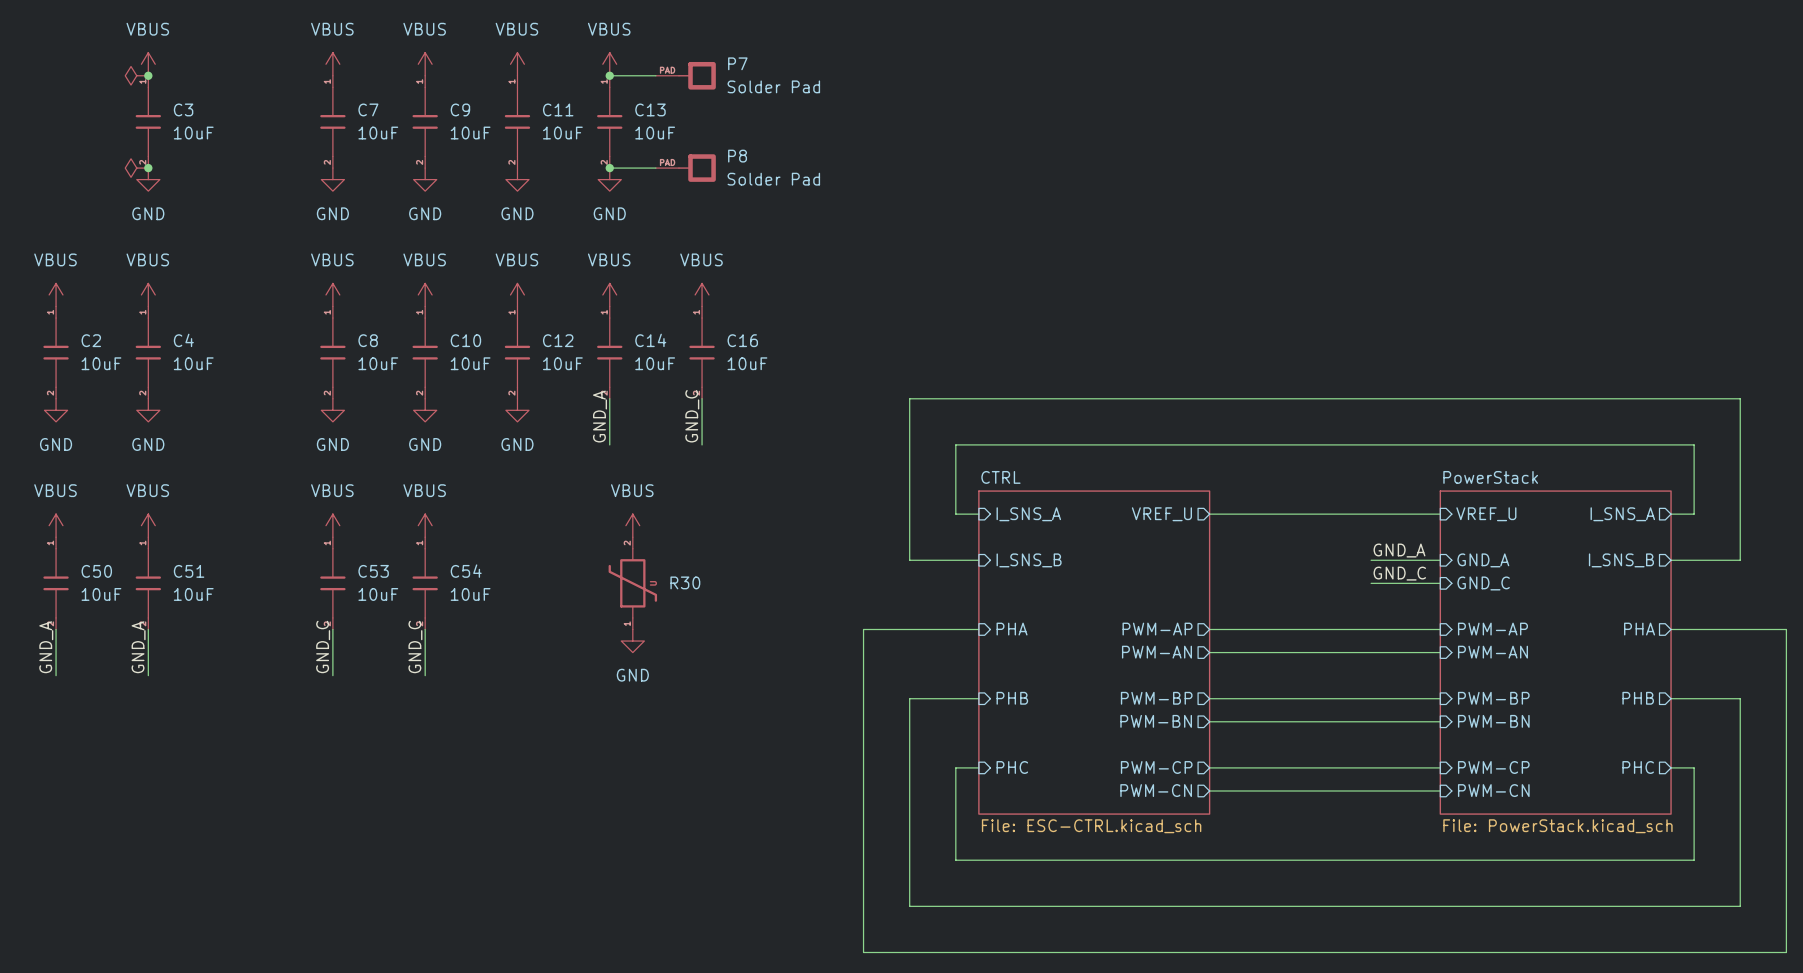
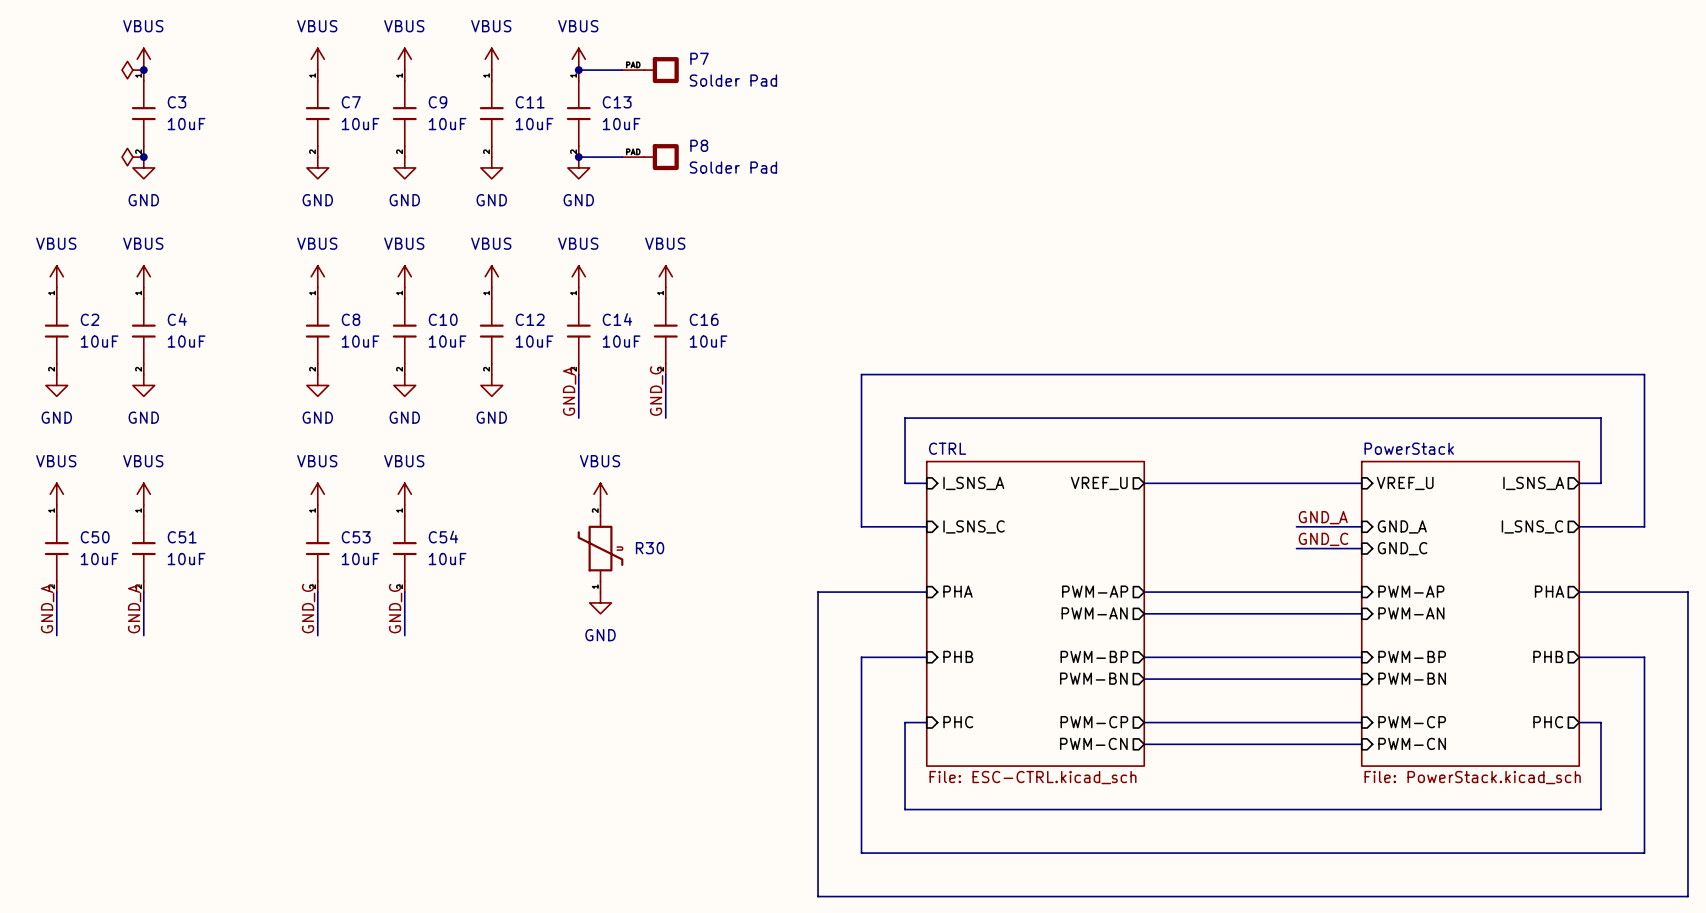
sheet pin: I_SNS_B (1029, 560) -> I_SNS_C (974, 526)
sheet pin: I_SNS_B (1621, 560) -> I_SNS_C (1532, 526)

